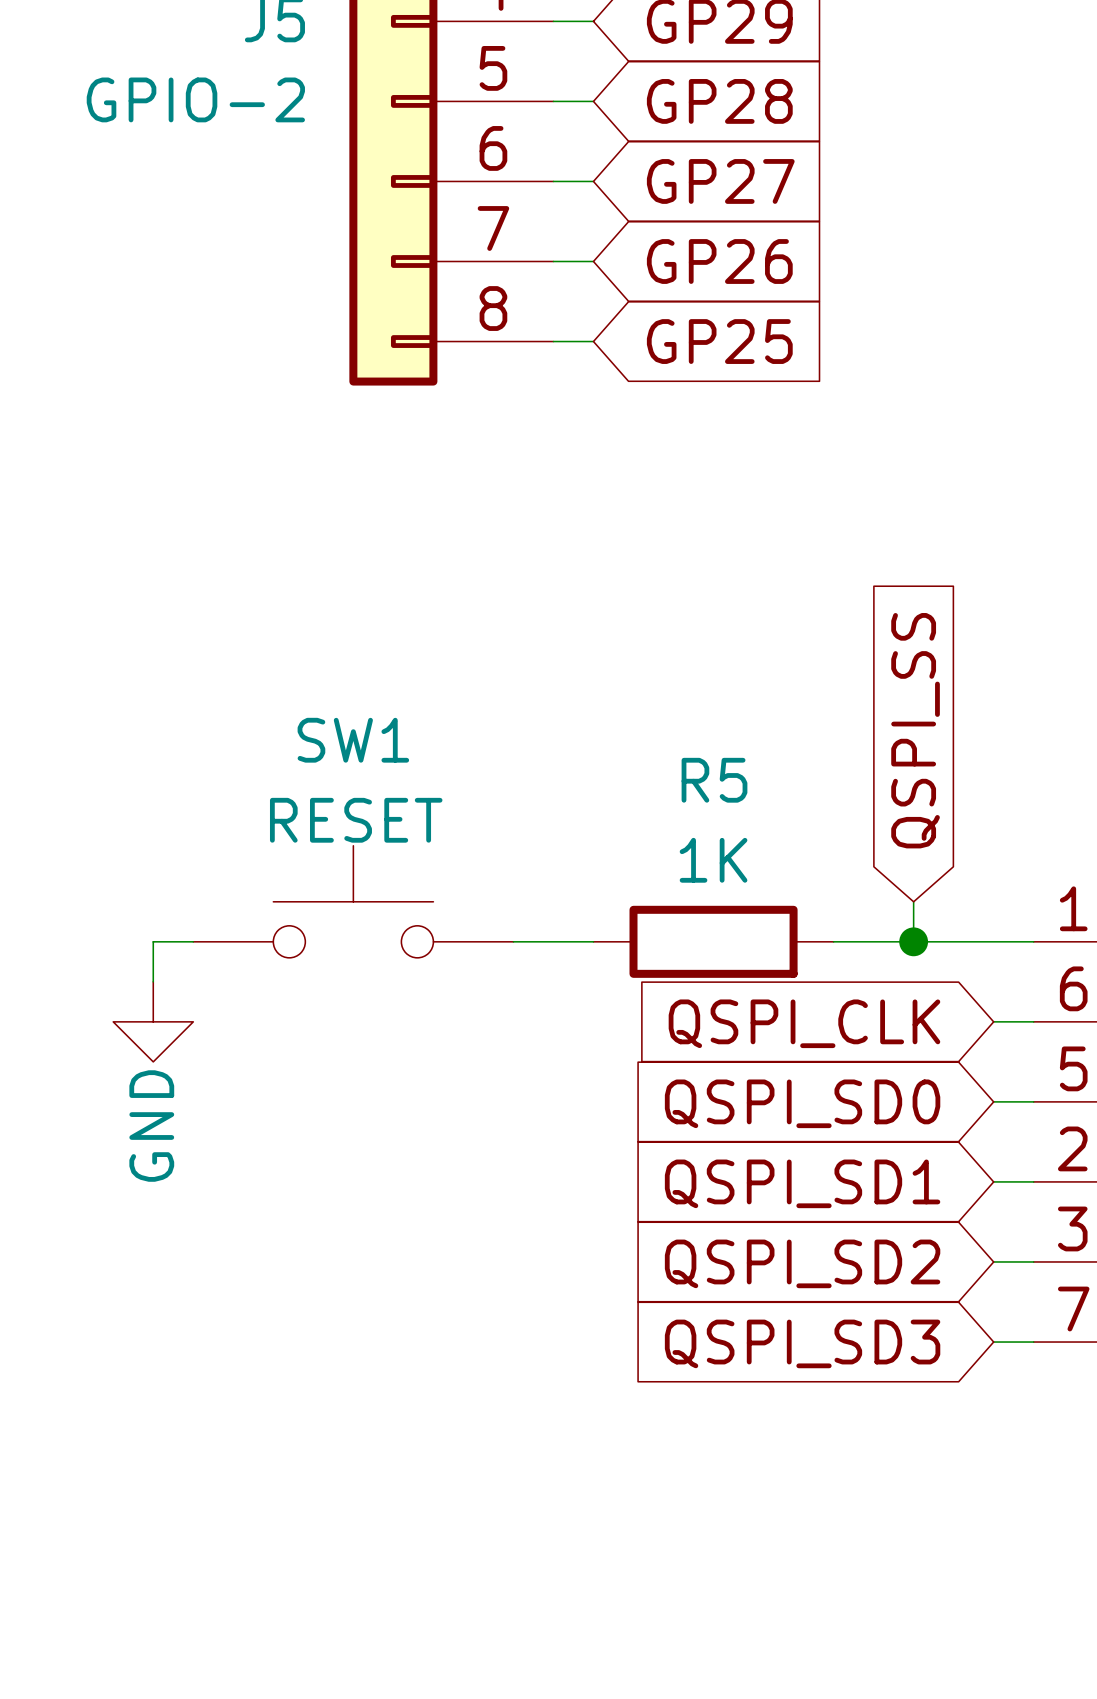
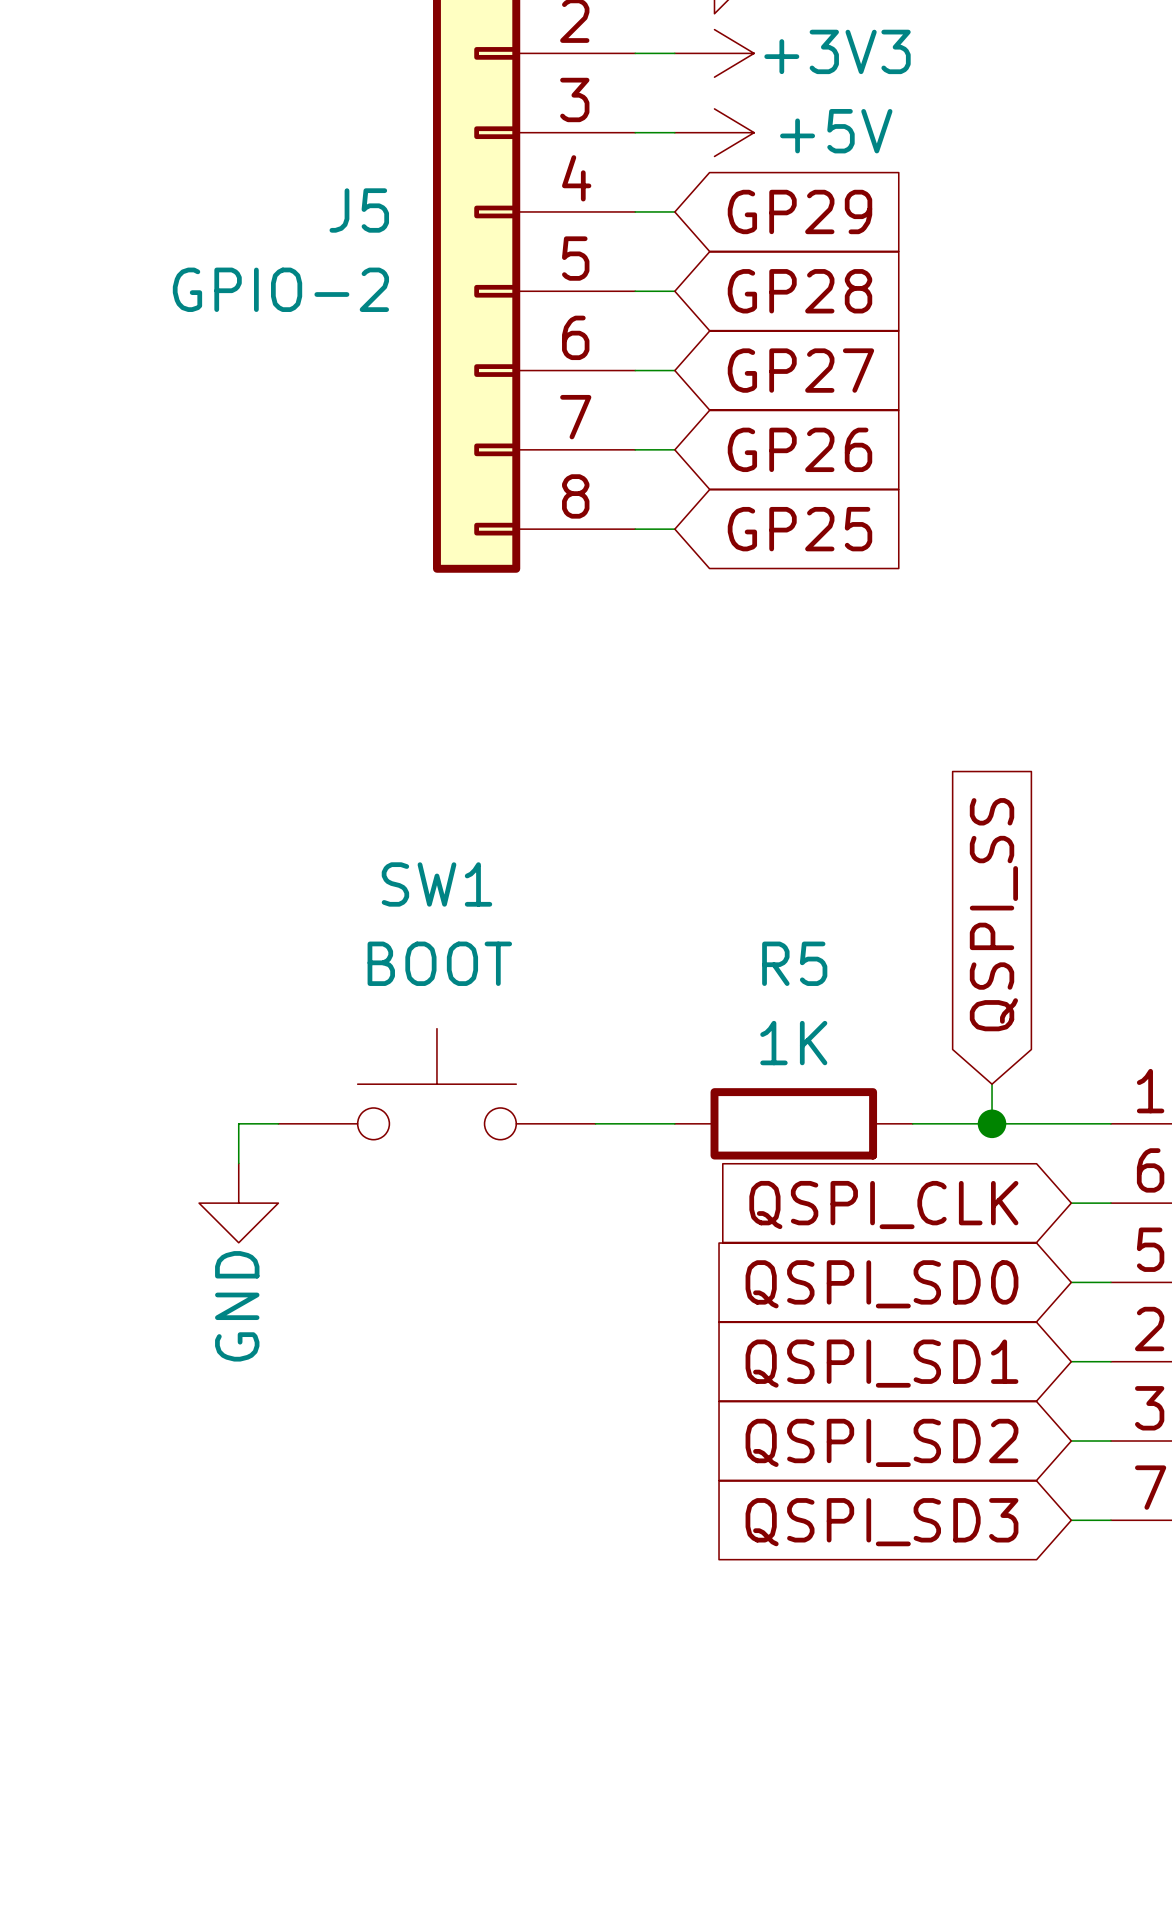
SW1 name position: SW1 (353, 740) -> SW1 (436, 884)
SW1 value: RESET (356, 820) -> BOOT (439, 963)

